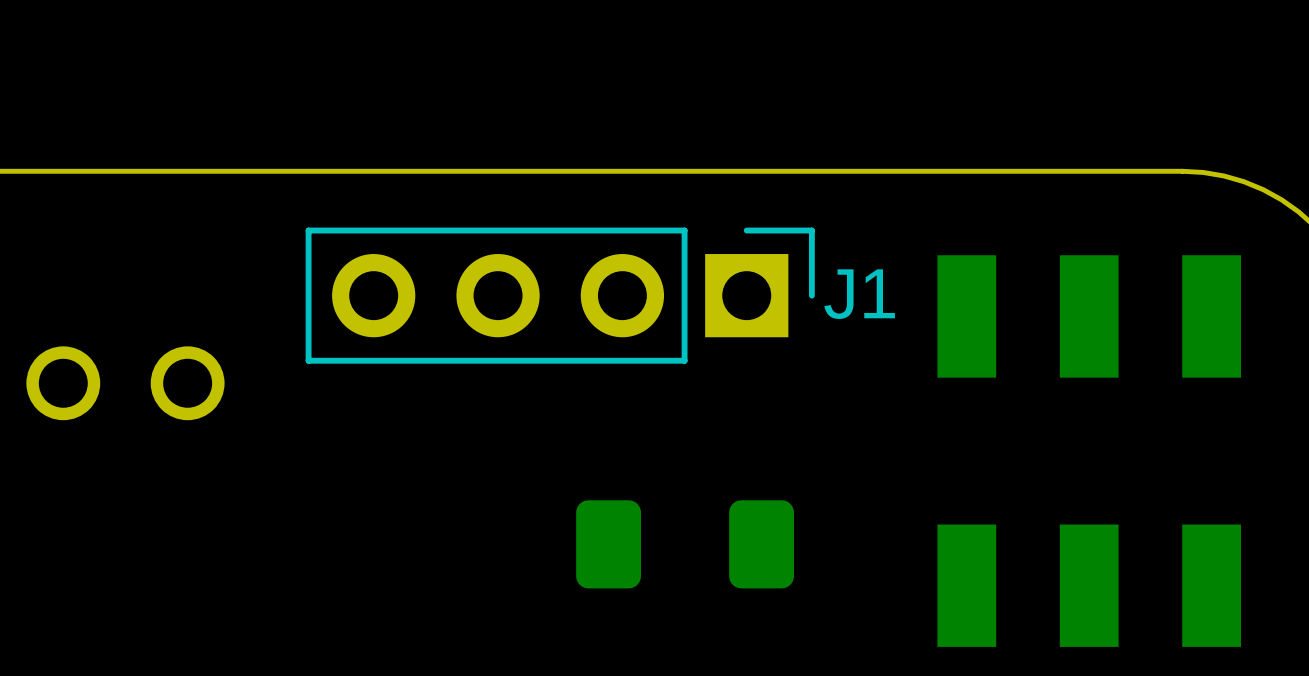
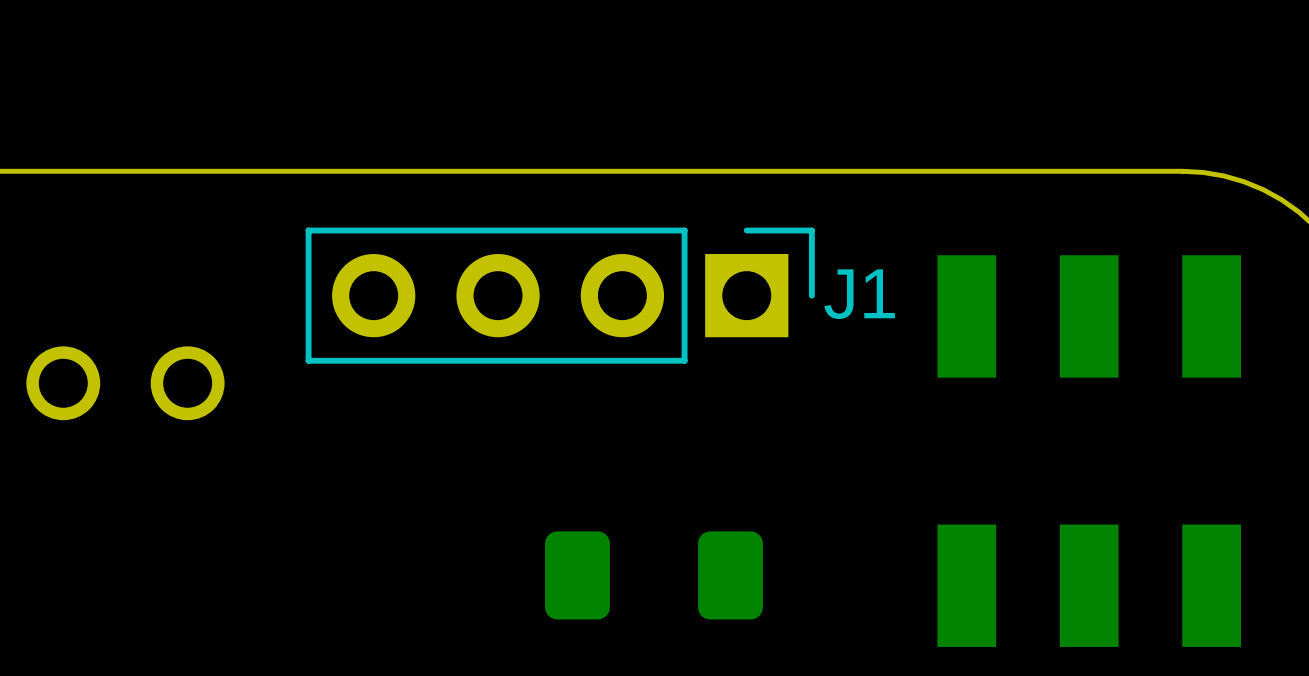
part position: (685, 544) -> (653, 575)

